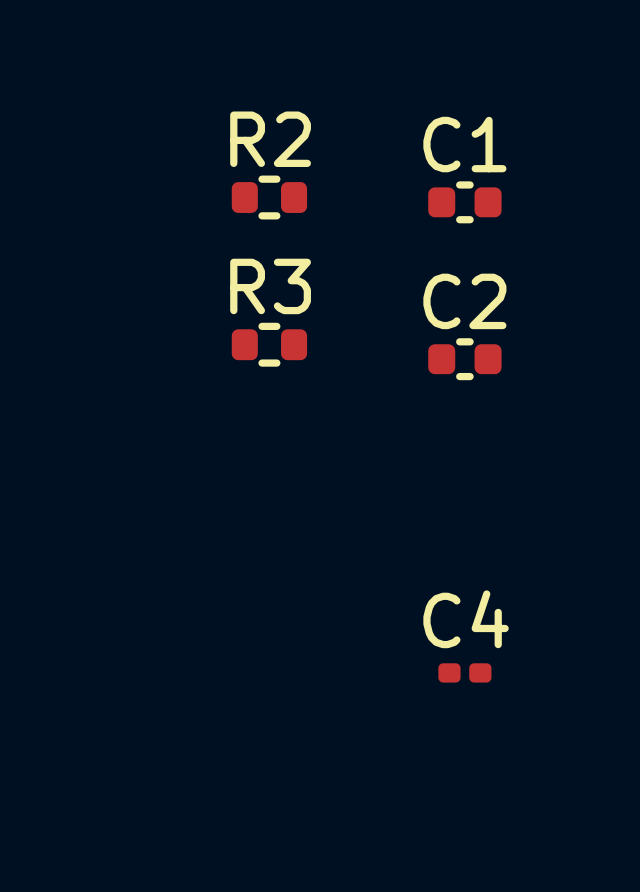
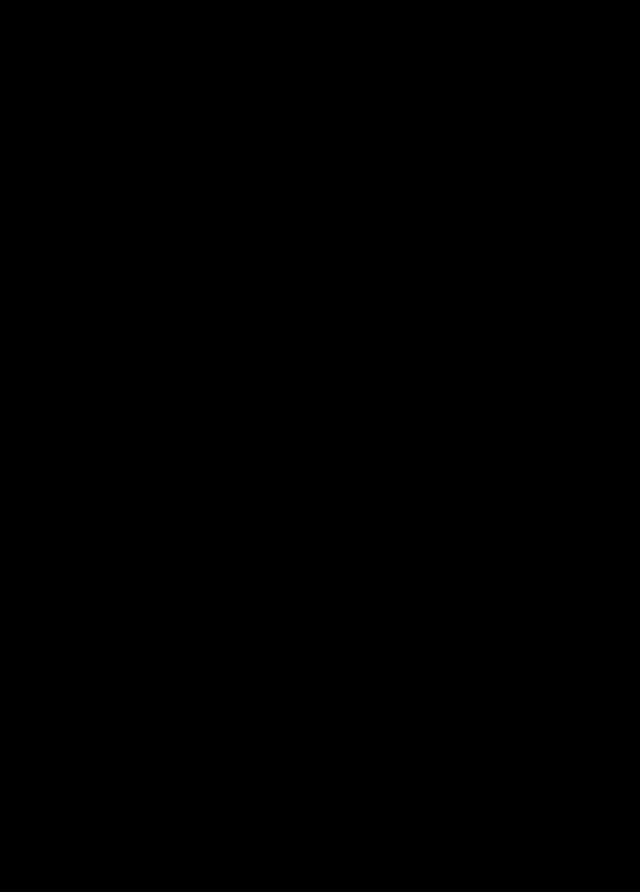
R2: (269, 197) -> none
C1: (464, 202) -> none
R3: (269, 344) -> none
C2: (464, 359) -> none
C4: (464, 672) -> none

